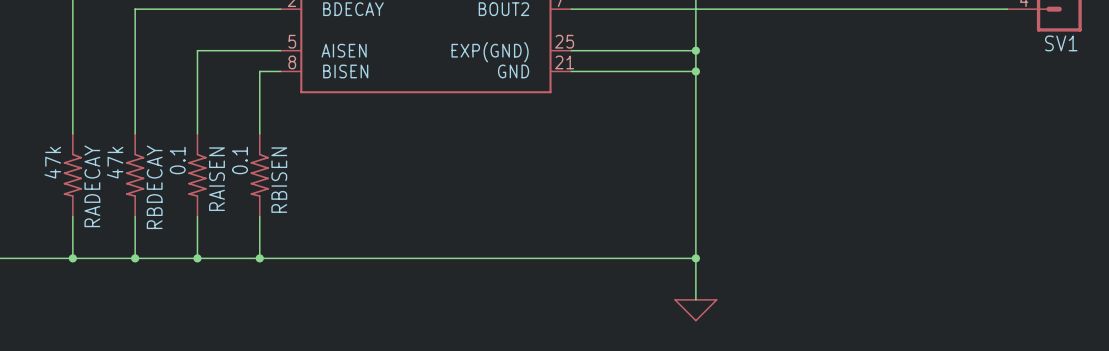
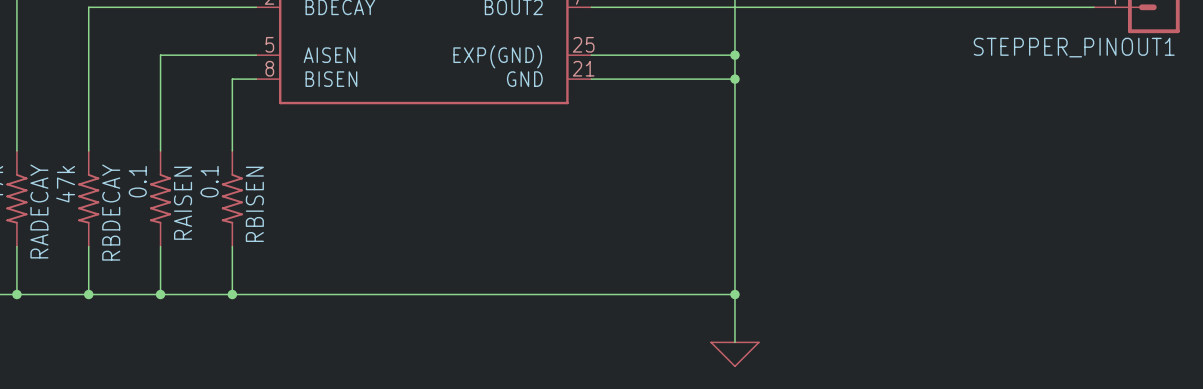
SV1 name: SV1 (1061, 43) -> STEPPER_PINOUT1 (1074, 47)

